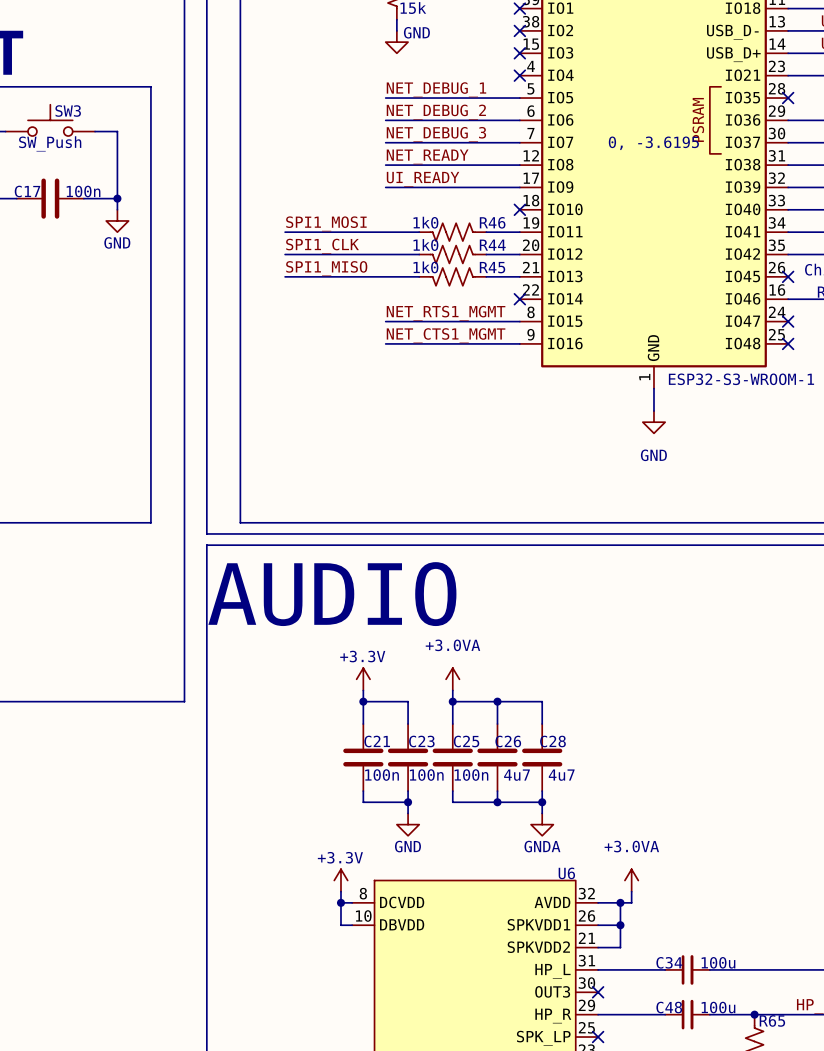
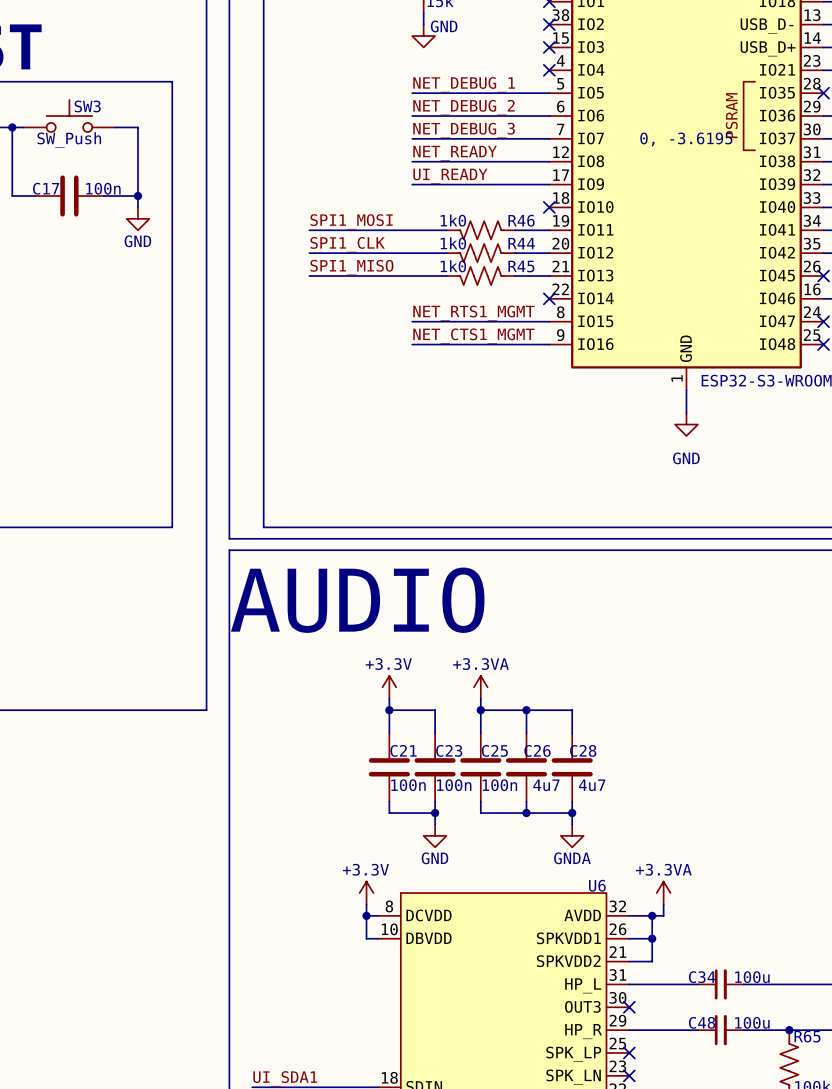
power symbol: +3.0VA (452, 679) -> +3.3VA (480, 687)
power symbol: +3.0VA (631, 880) -> +3.3VA (663, 893)

